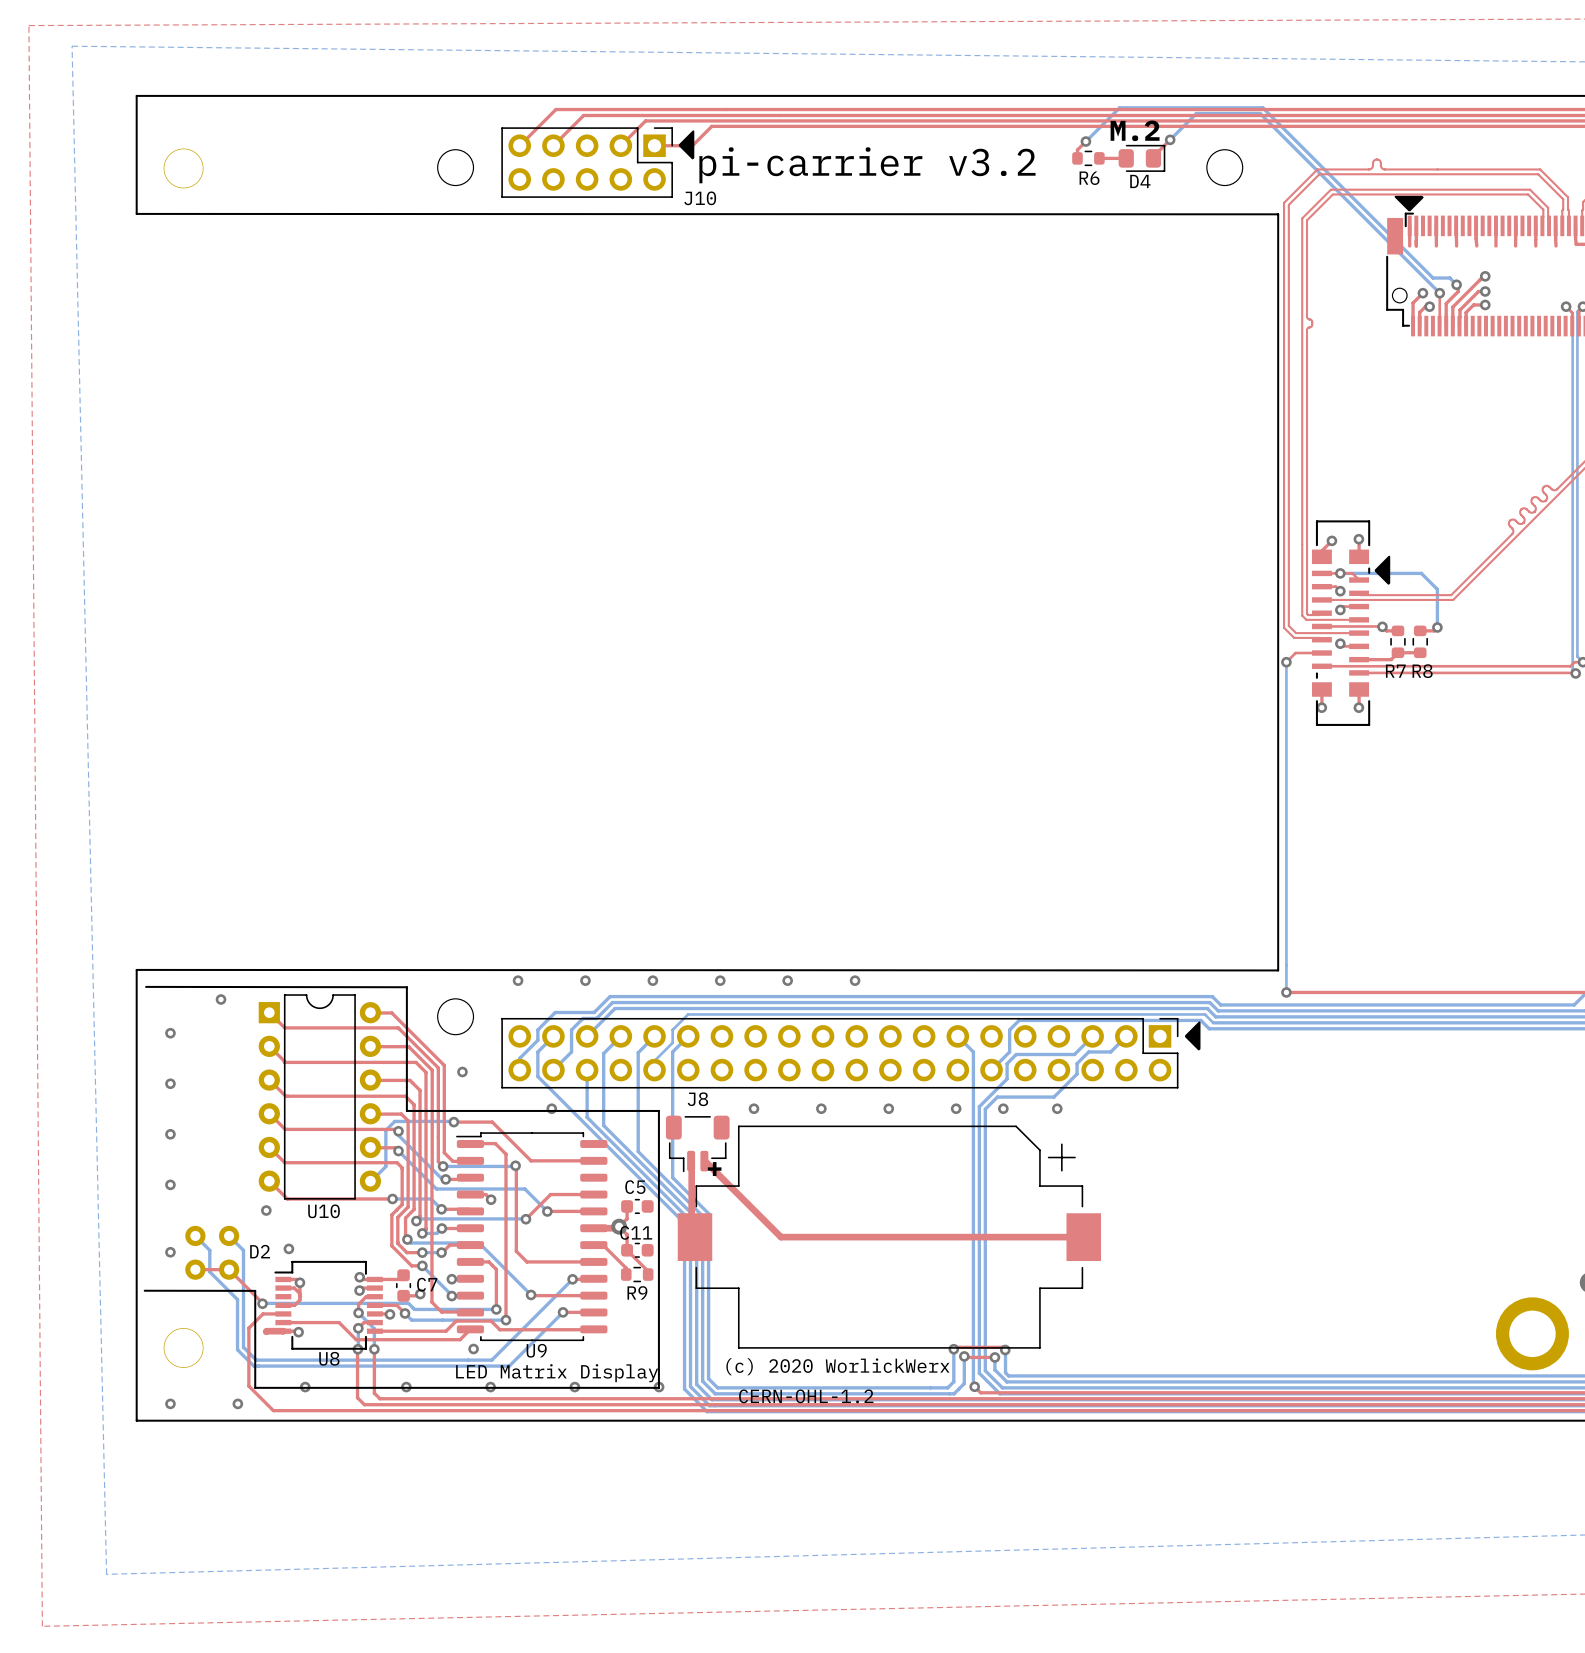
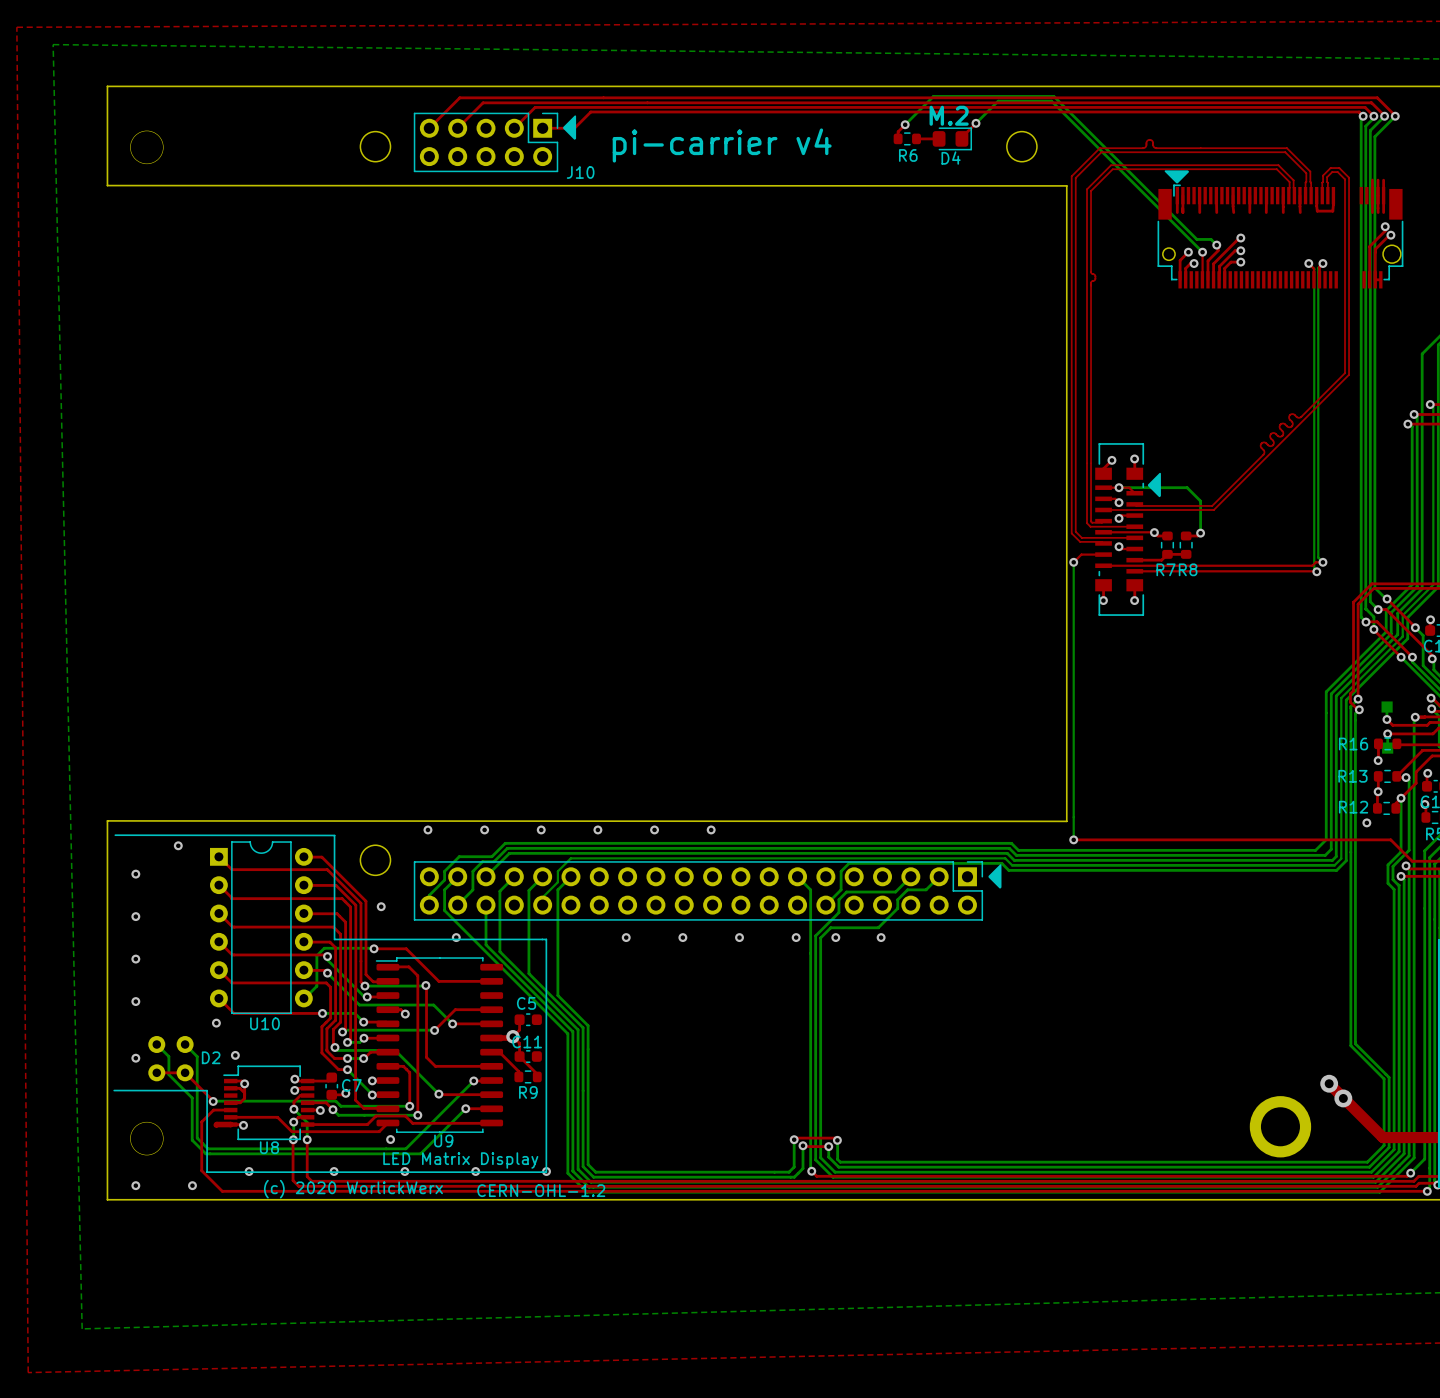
text: pi-carrier v3.2 (867, 165) -> pi-carrier v4 (722, 145)
J8: (697, 1143) -> none
top track: (691, 1161) (691, 1233) (694, 1237) -> none
top track: (704, 1161) (780, 1237) (1083, 1237) -> none
text: + (714, 1169) -> none
part: (889, 1237) -> none
text: (c) 2020 WorlickWerx (837, 1366) -> none
text position: CERN-OHL-1.2 (806, 1396) -> CERN-OHL-1.2 (541, 1190)
text: none -> (c) 2020 WorlickWerx (353, 1189)

